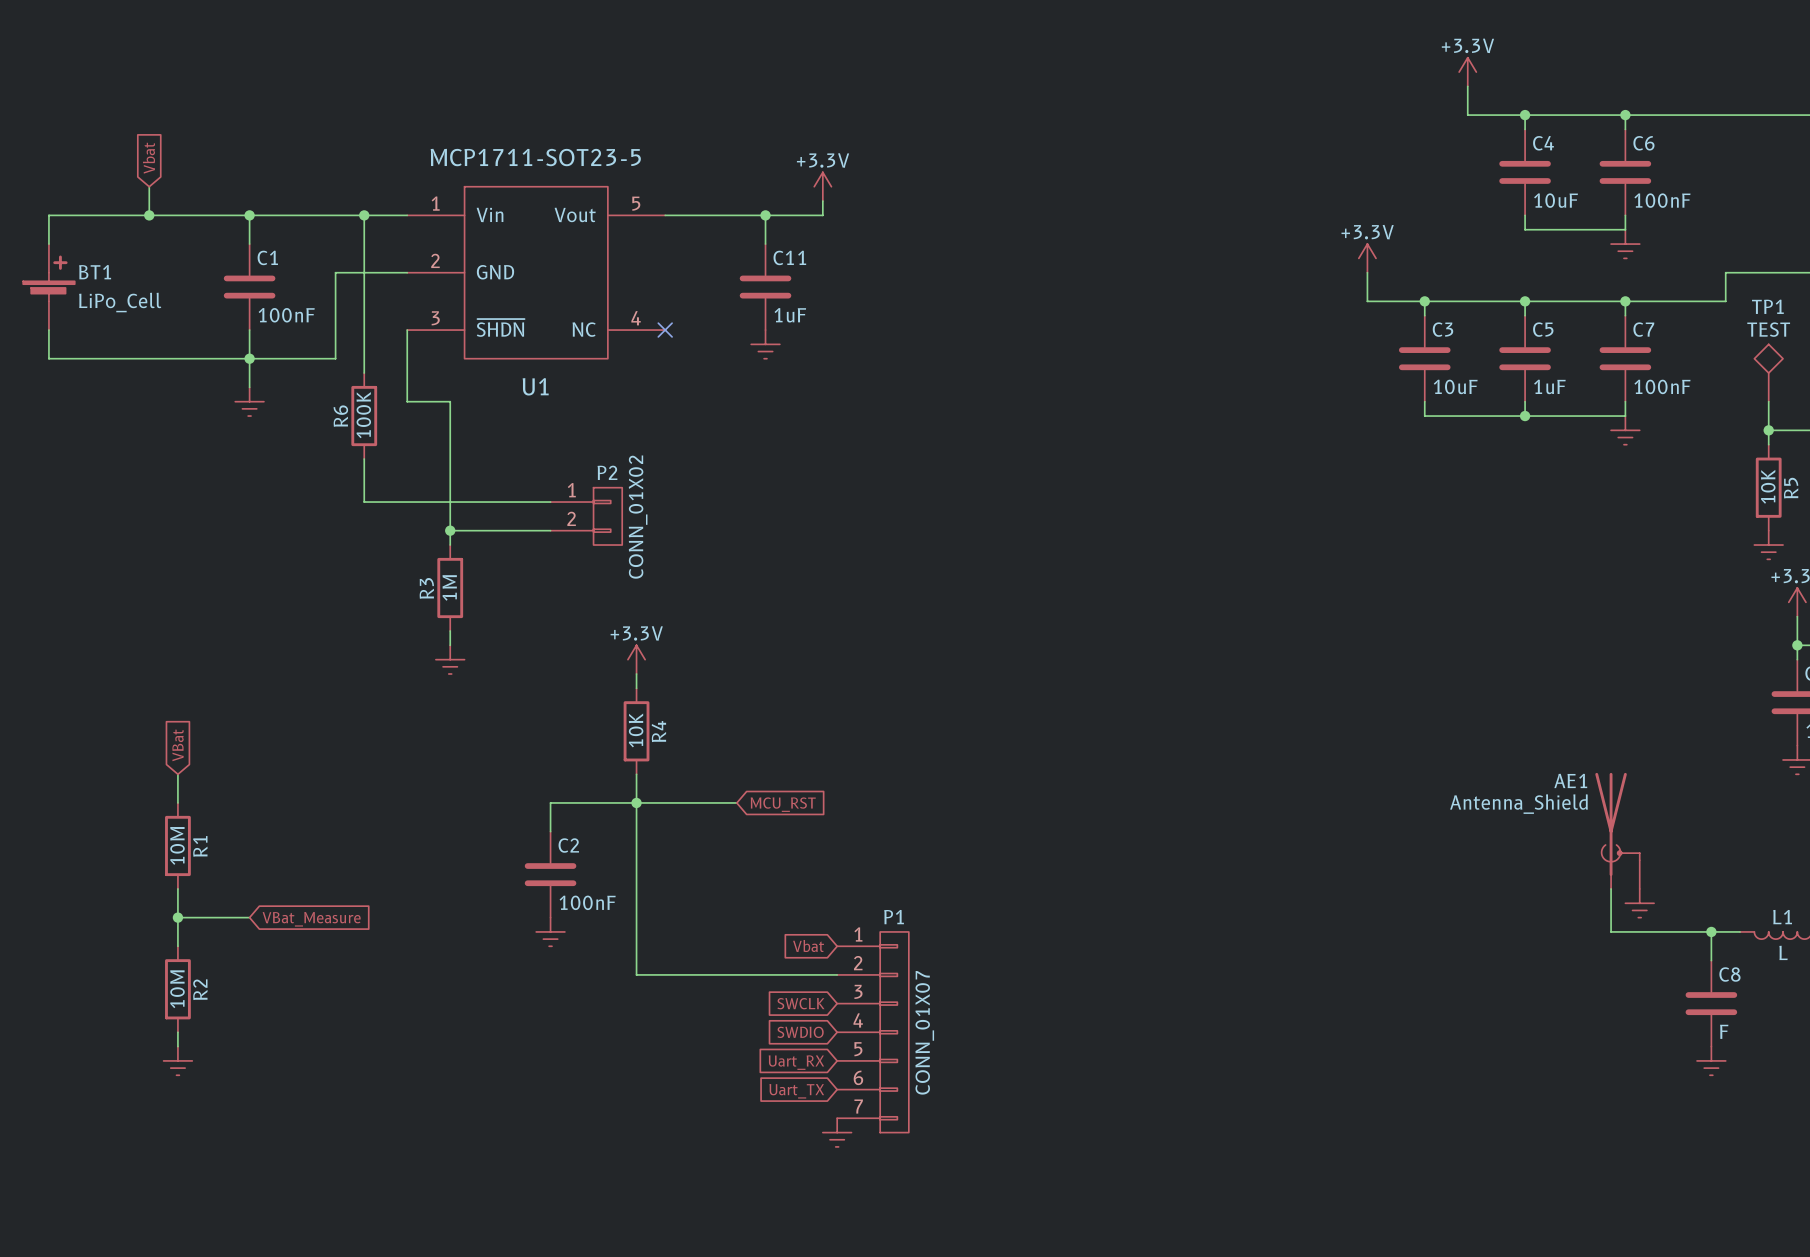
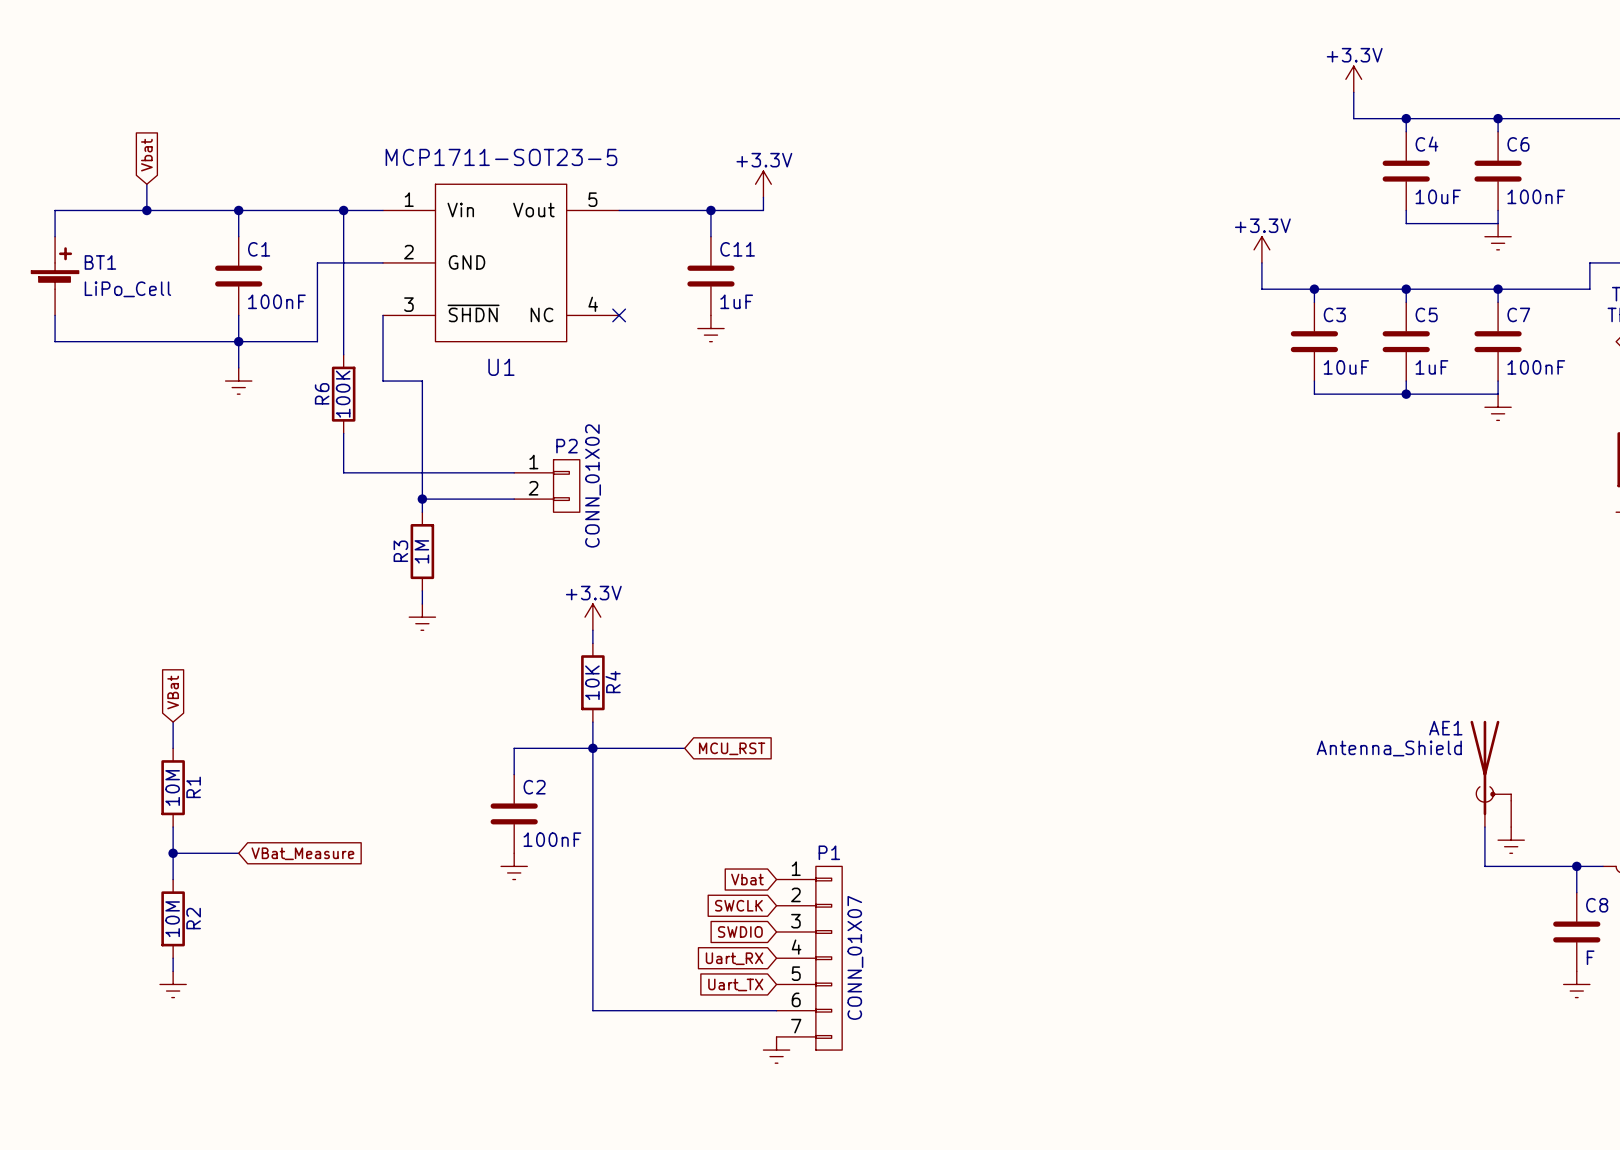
wire: (636, 974) (837, 974) -> (592, 905) (592, 1010) (776, 1010)
global label: none -> SWCLK (738, 905)
global label: SWCLK (800, 1003) -> SWDIO (740, 931)
global label: SWDIO (800, 1032) -> Uart_RX (734, 958)
global label: Uart_RX (796, 1062) -> Uart_TX (735, 984)
global label: Uart_TX (796, 1091) -> none

